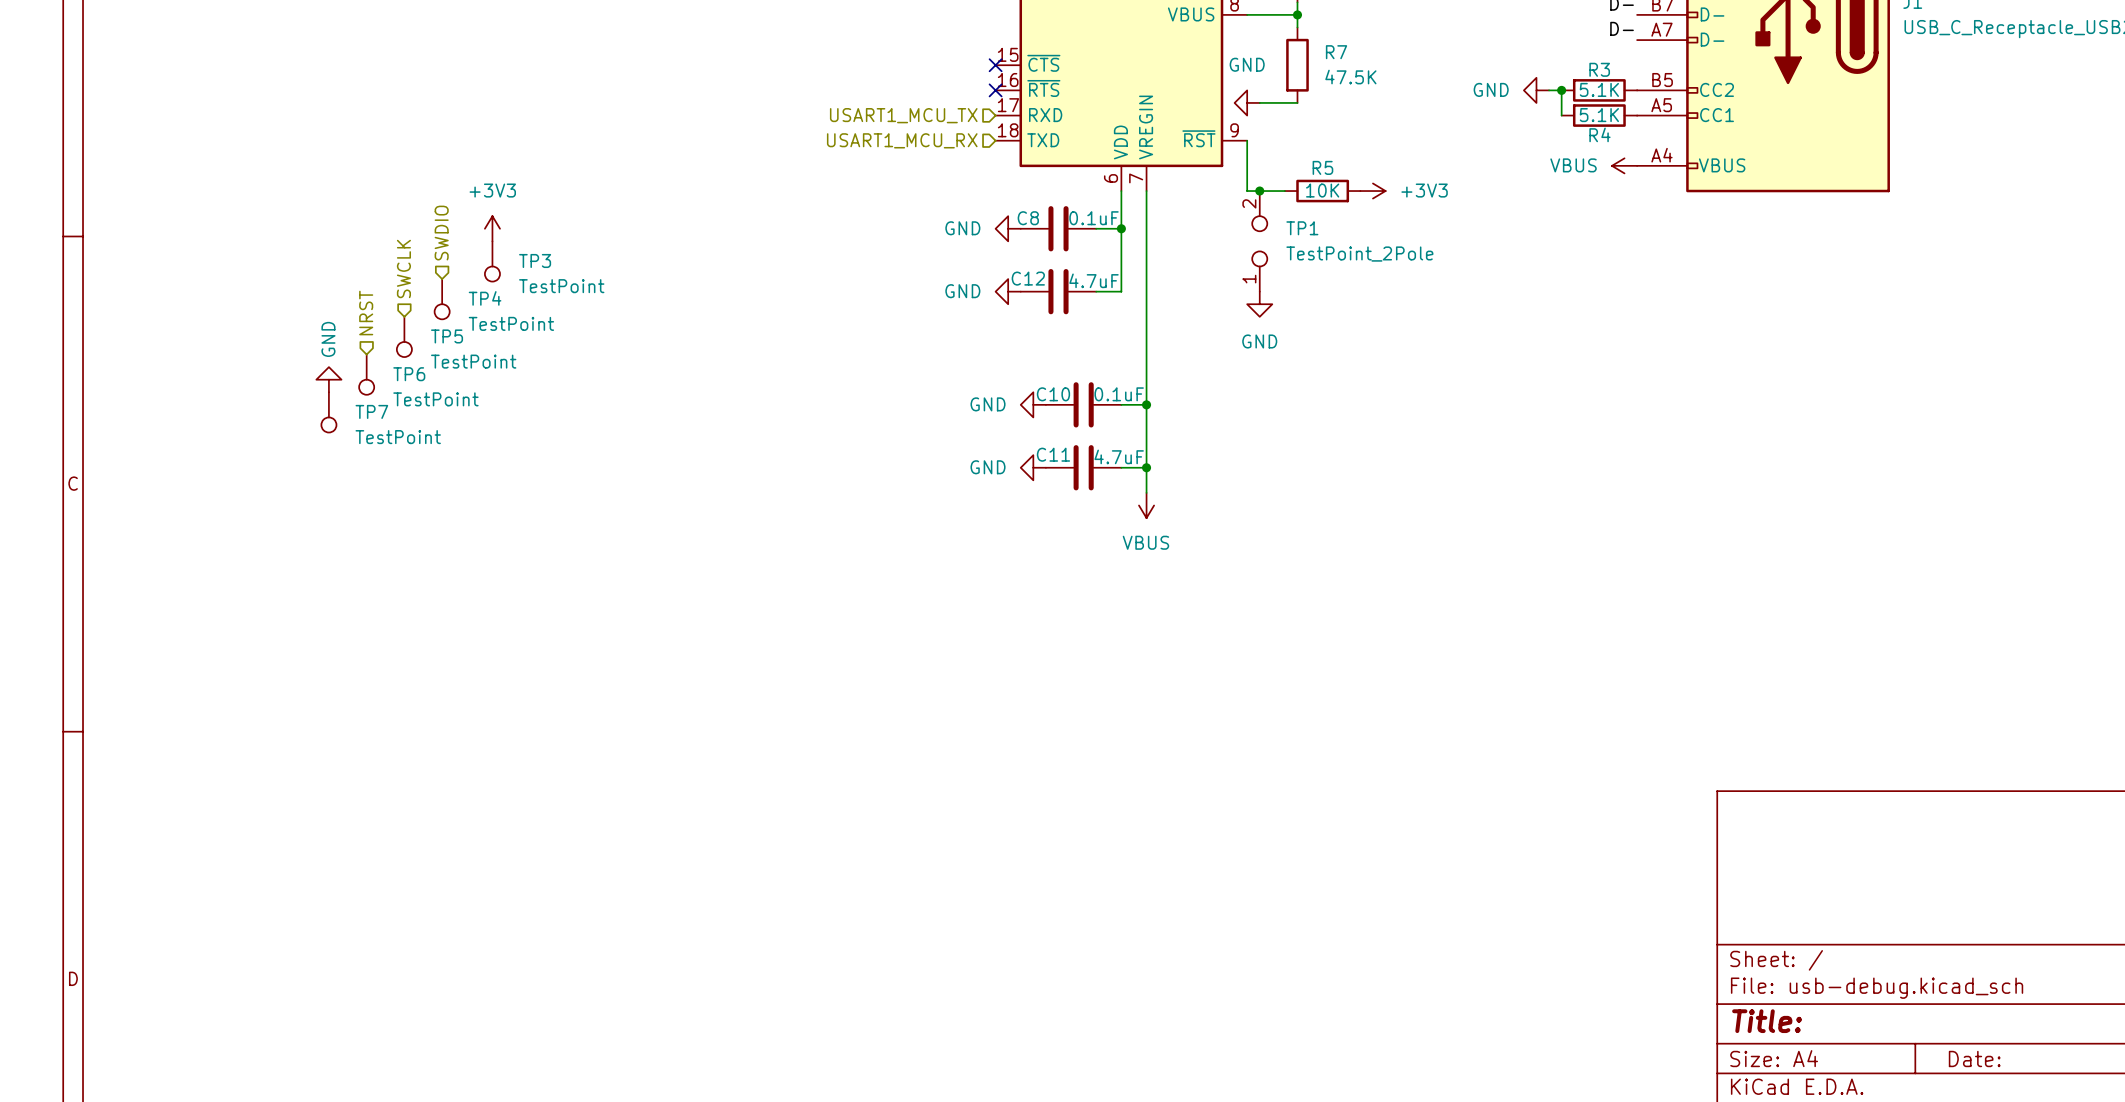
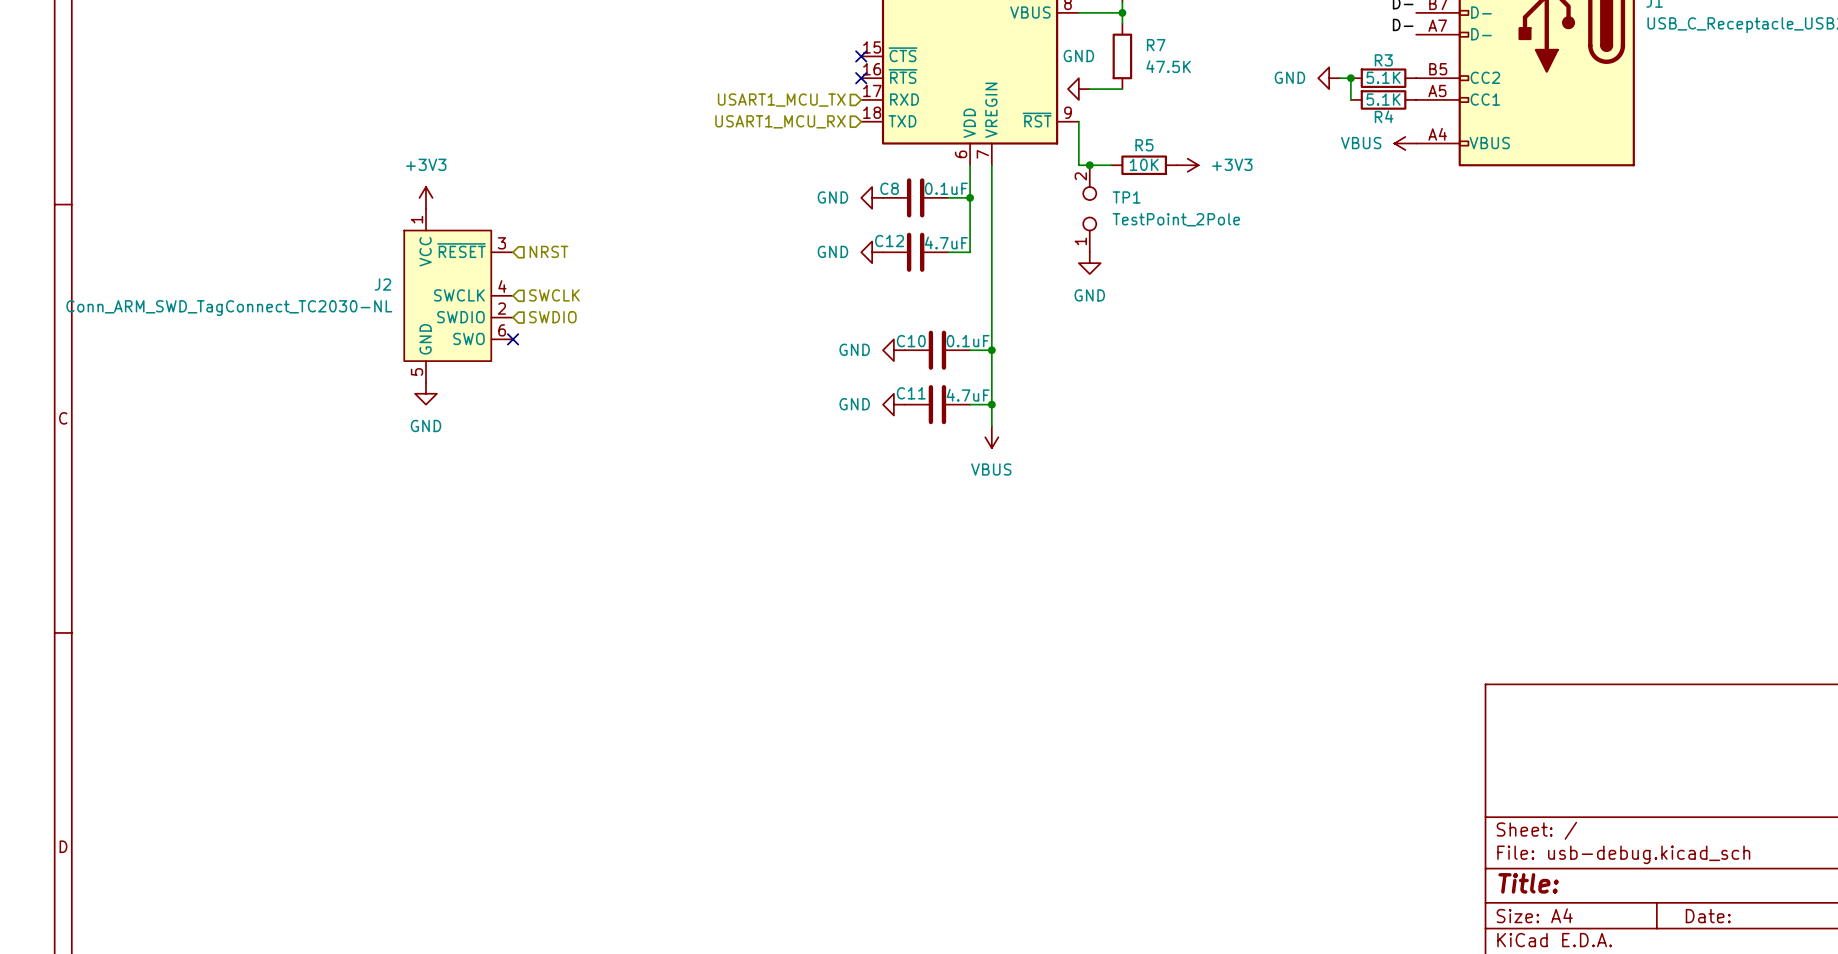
hierarchical label rotation: 0° (441, 233) -> 90° clockwise (552, 317)
hierarchical label position: SWDIO (441, 233) -> SWDIO (552, 317)
TP3: TestPoint (492, 261) -> none
hierarchical label rotation: 0° (403, 268) -> 90° clockwise (554, 295)
hierarchical label position: SWCLK (403, 268) -> SWCLK (554, 295)
TP4: TestPoint (442, 299) -> none
hierarchical label rotation: 0° (366, 313) -> 90° clockwise (548, 251)
hierarchical label position: NRST (366, 313) -> NRST (548, 251)
TP5: TestPoint (404, 336) -> none
J2: none -> Conn_ARM_SWD_TagConnect_TC2030-NL (458, 295)
TP6: TestPoint (366, 374) -> none
power symbol rotation: 0° (328, 379) -> 180° (426, 393)
power symbol position: GND (328, 379) -> GND (426, 393)
no-connect mark: none -> (513, 339)
TP7: TestPoint (328, 412) -> none

